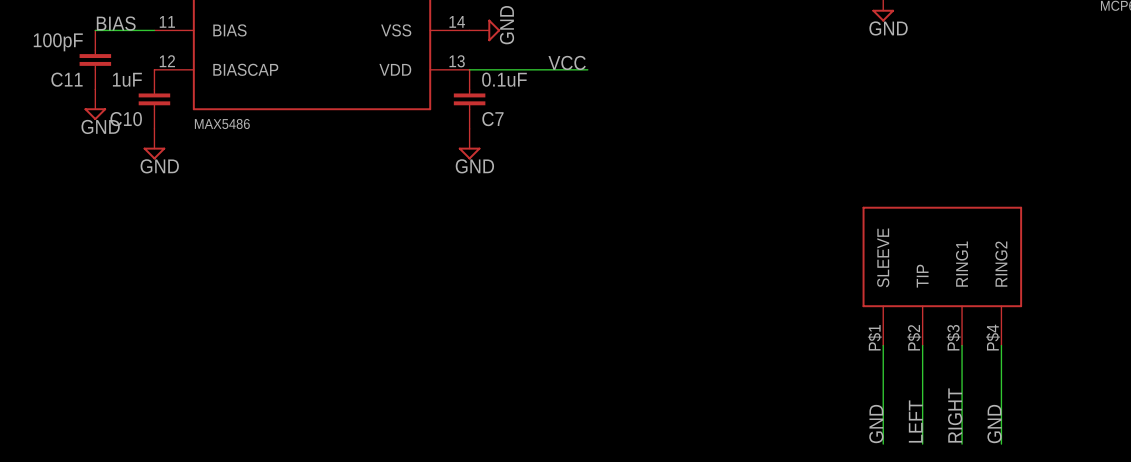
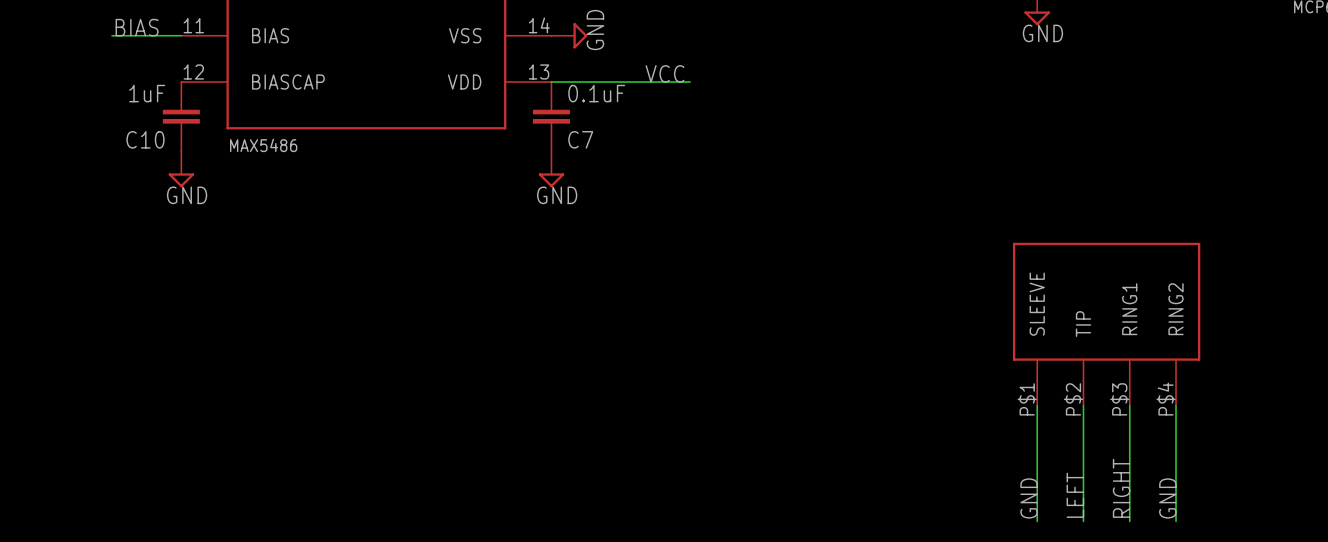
C11: 100pF (95, 59) -> none
power symbol: GND (95, 104) -> none

